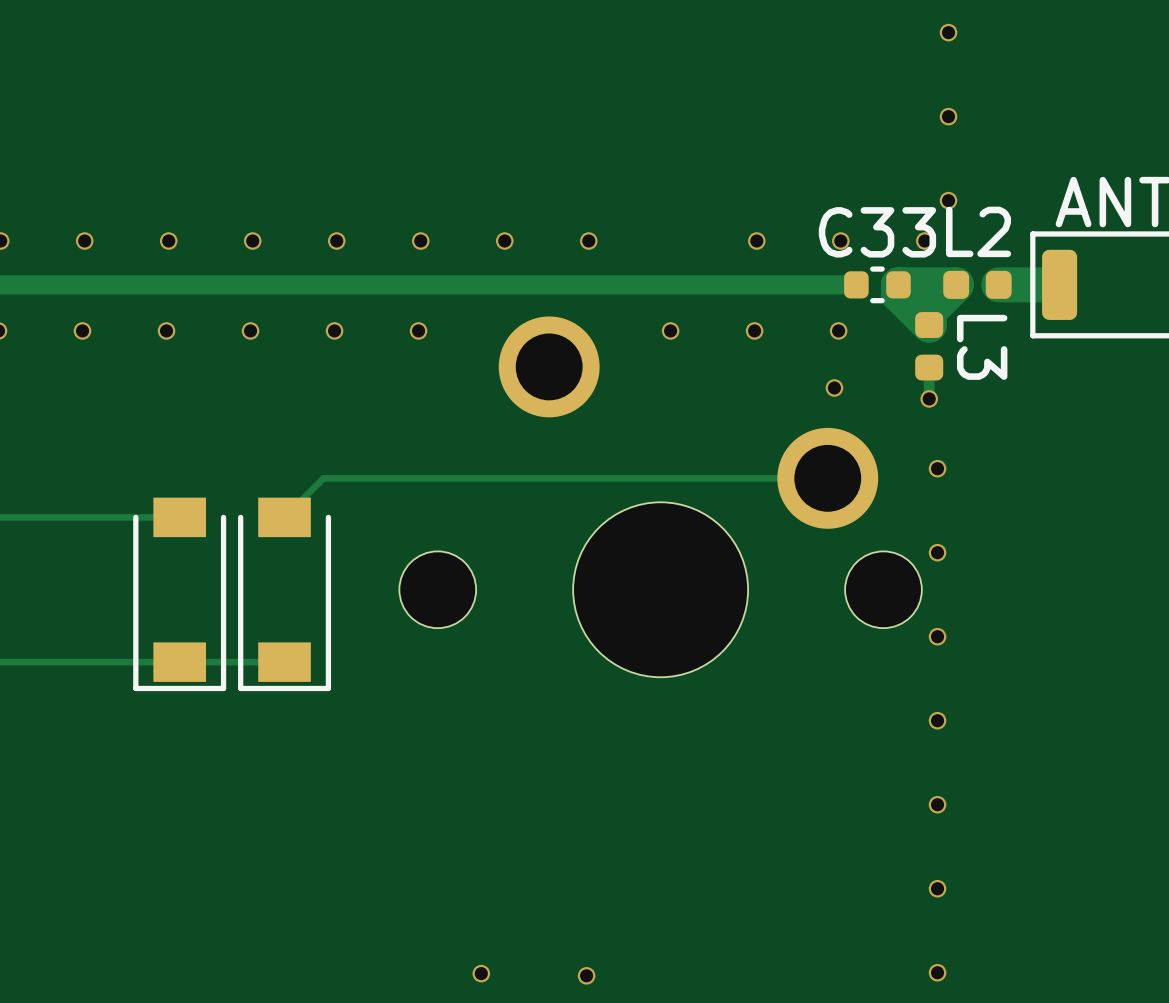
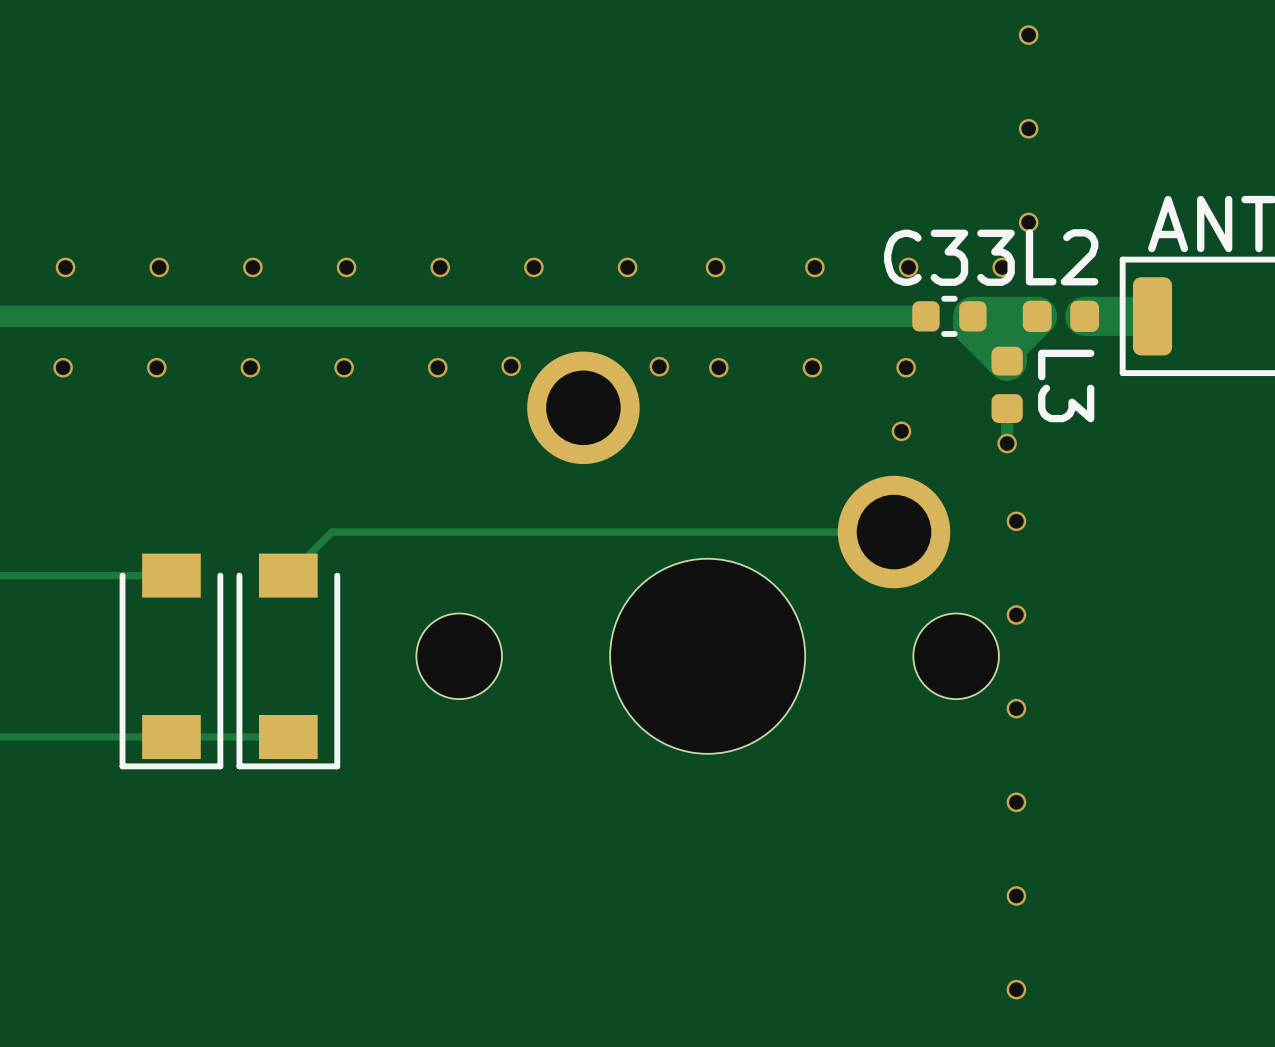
via: none -> (715, 267)
via: none -> (511, 366)
via: none -> (659, 366)

